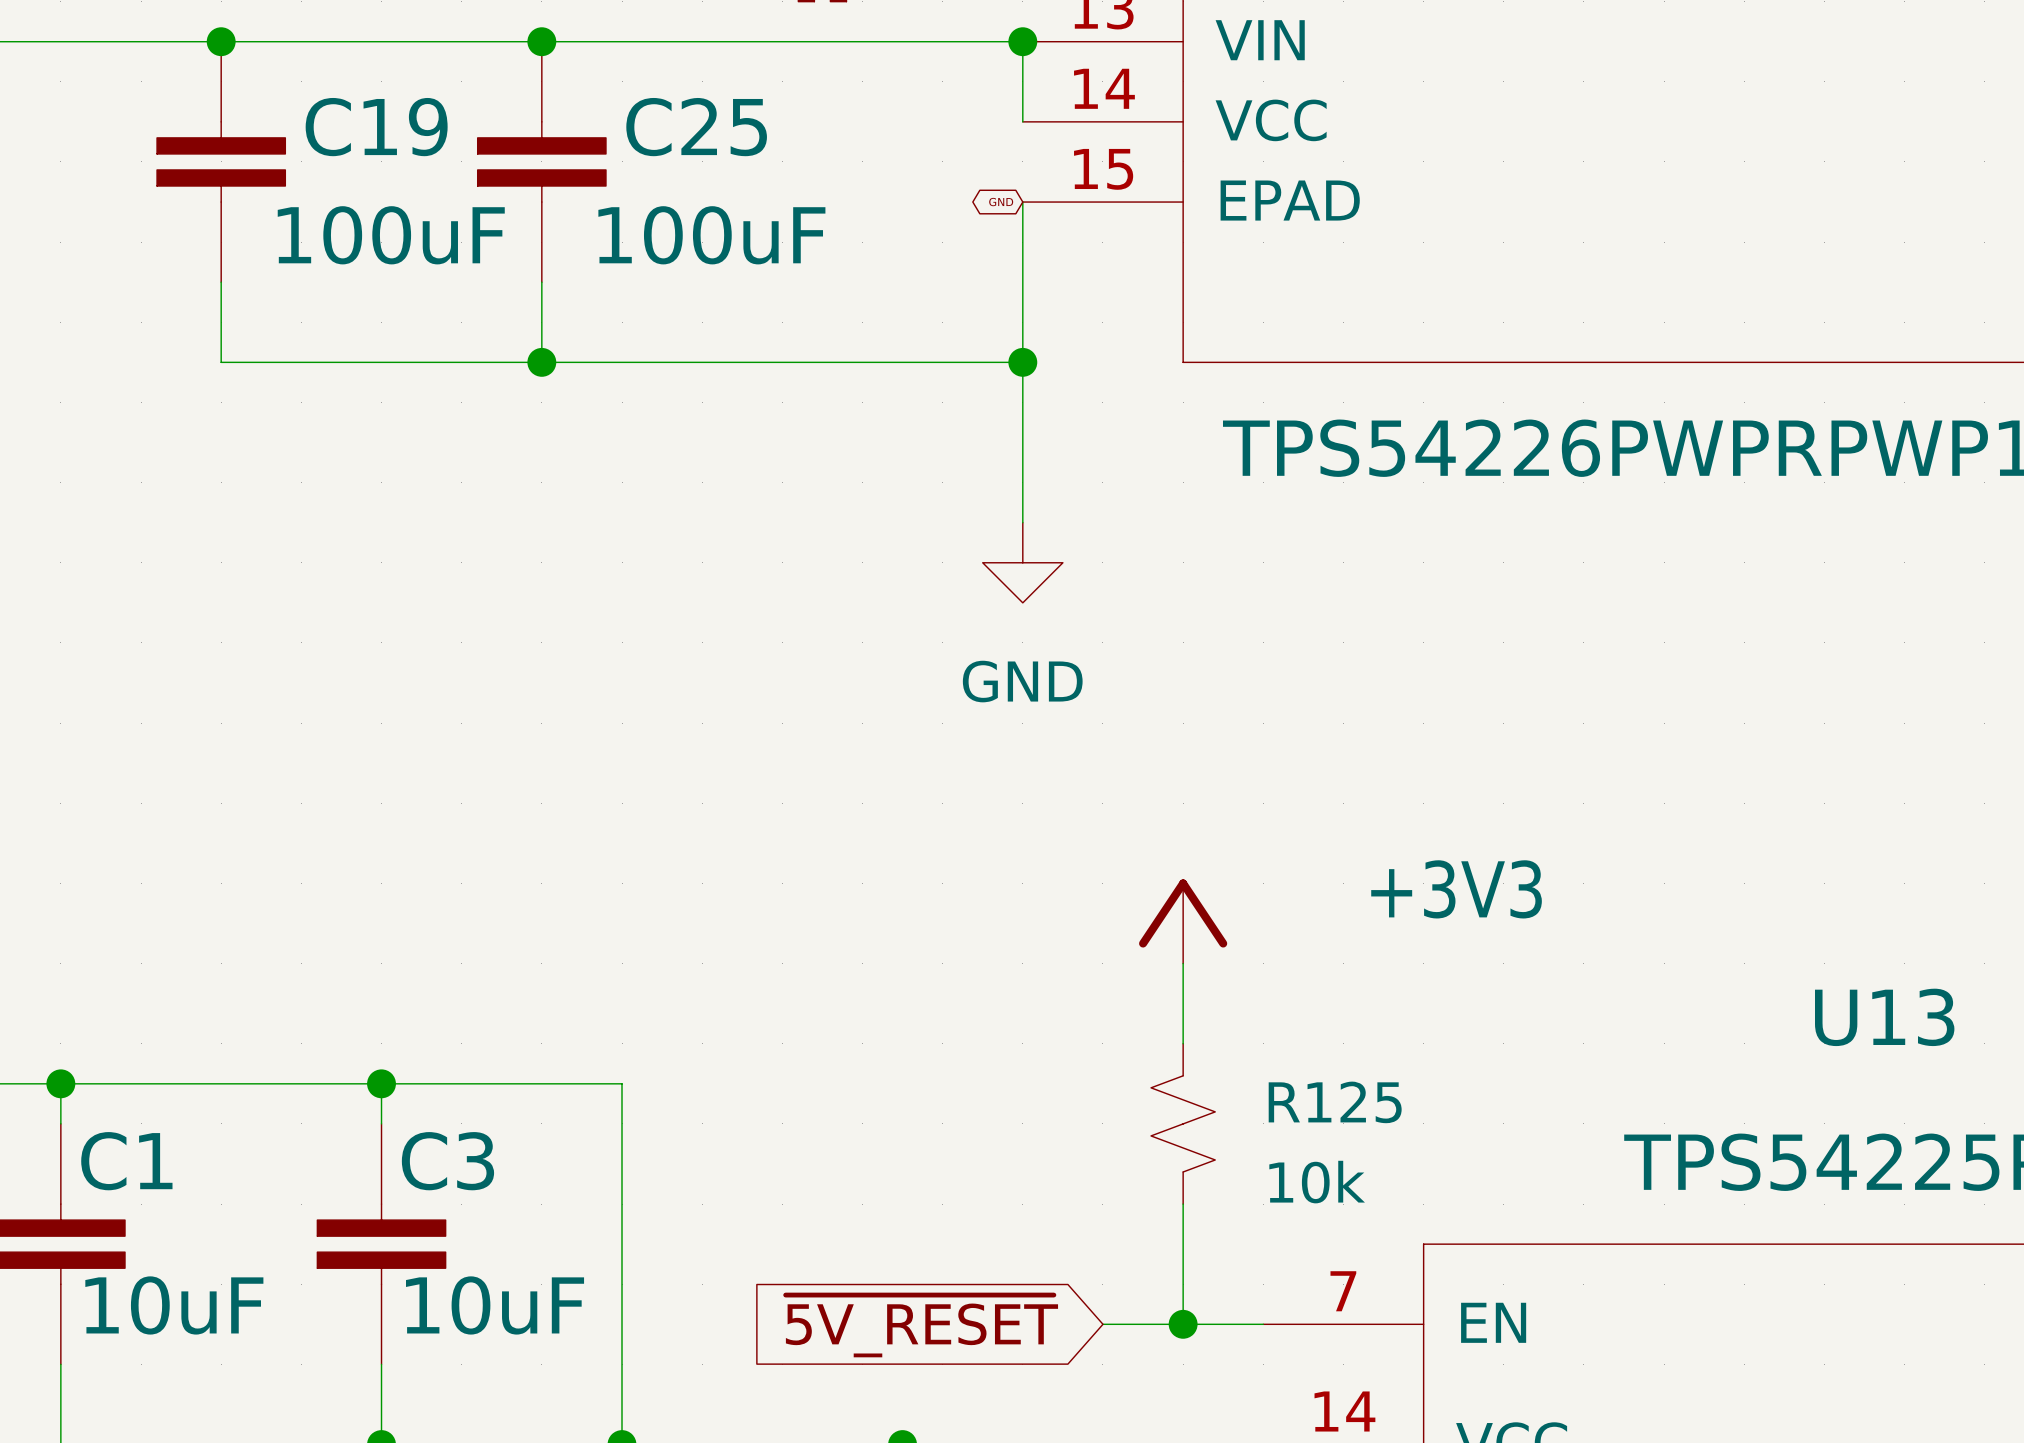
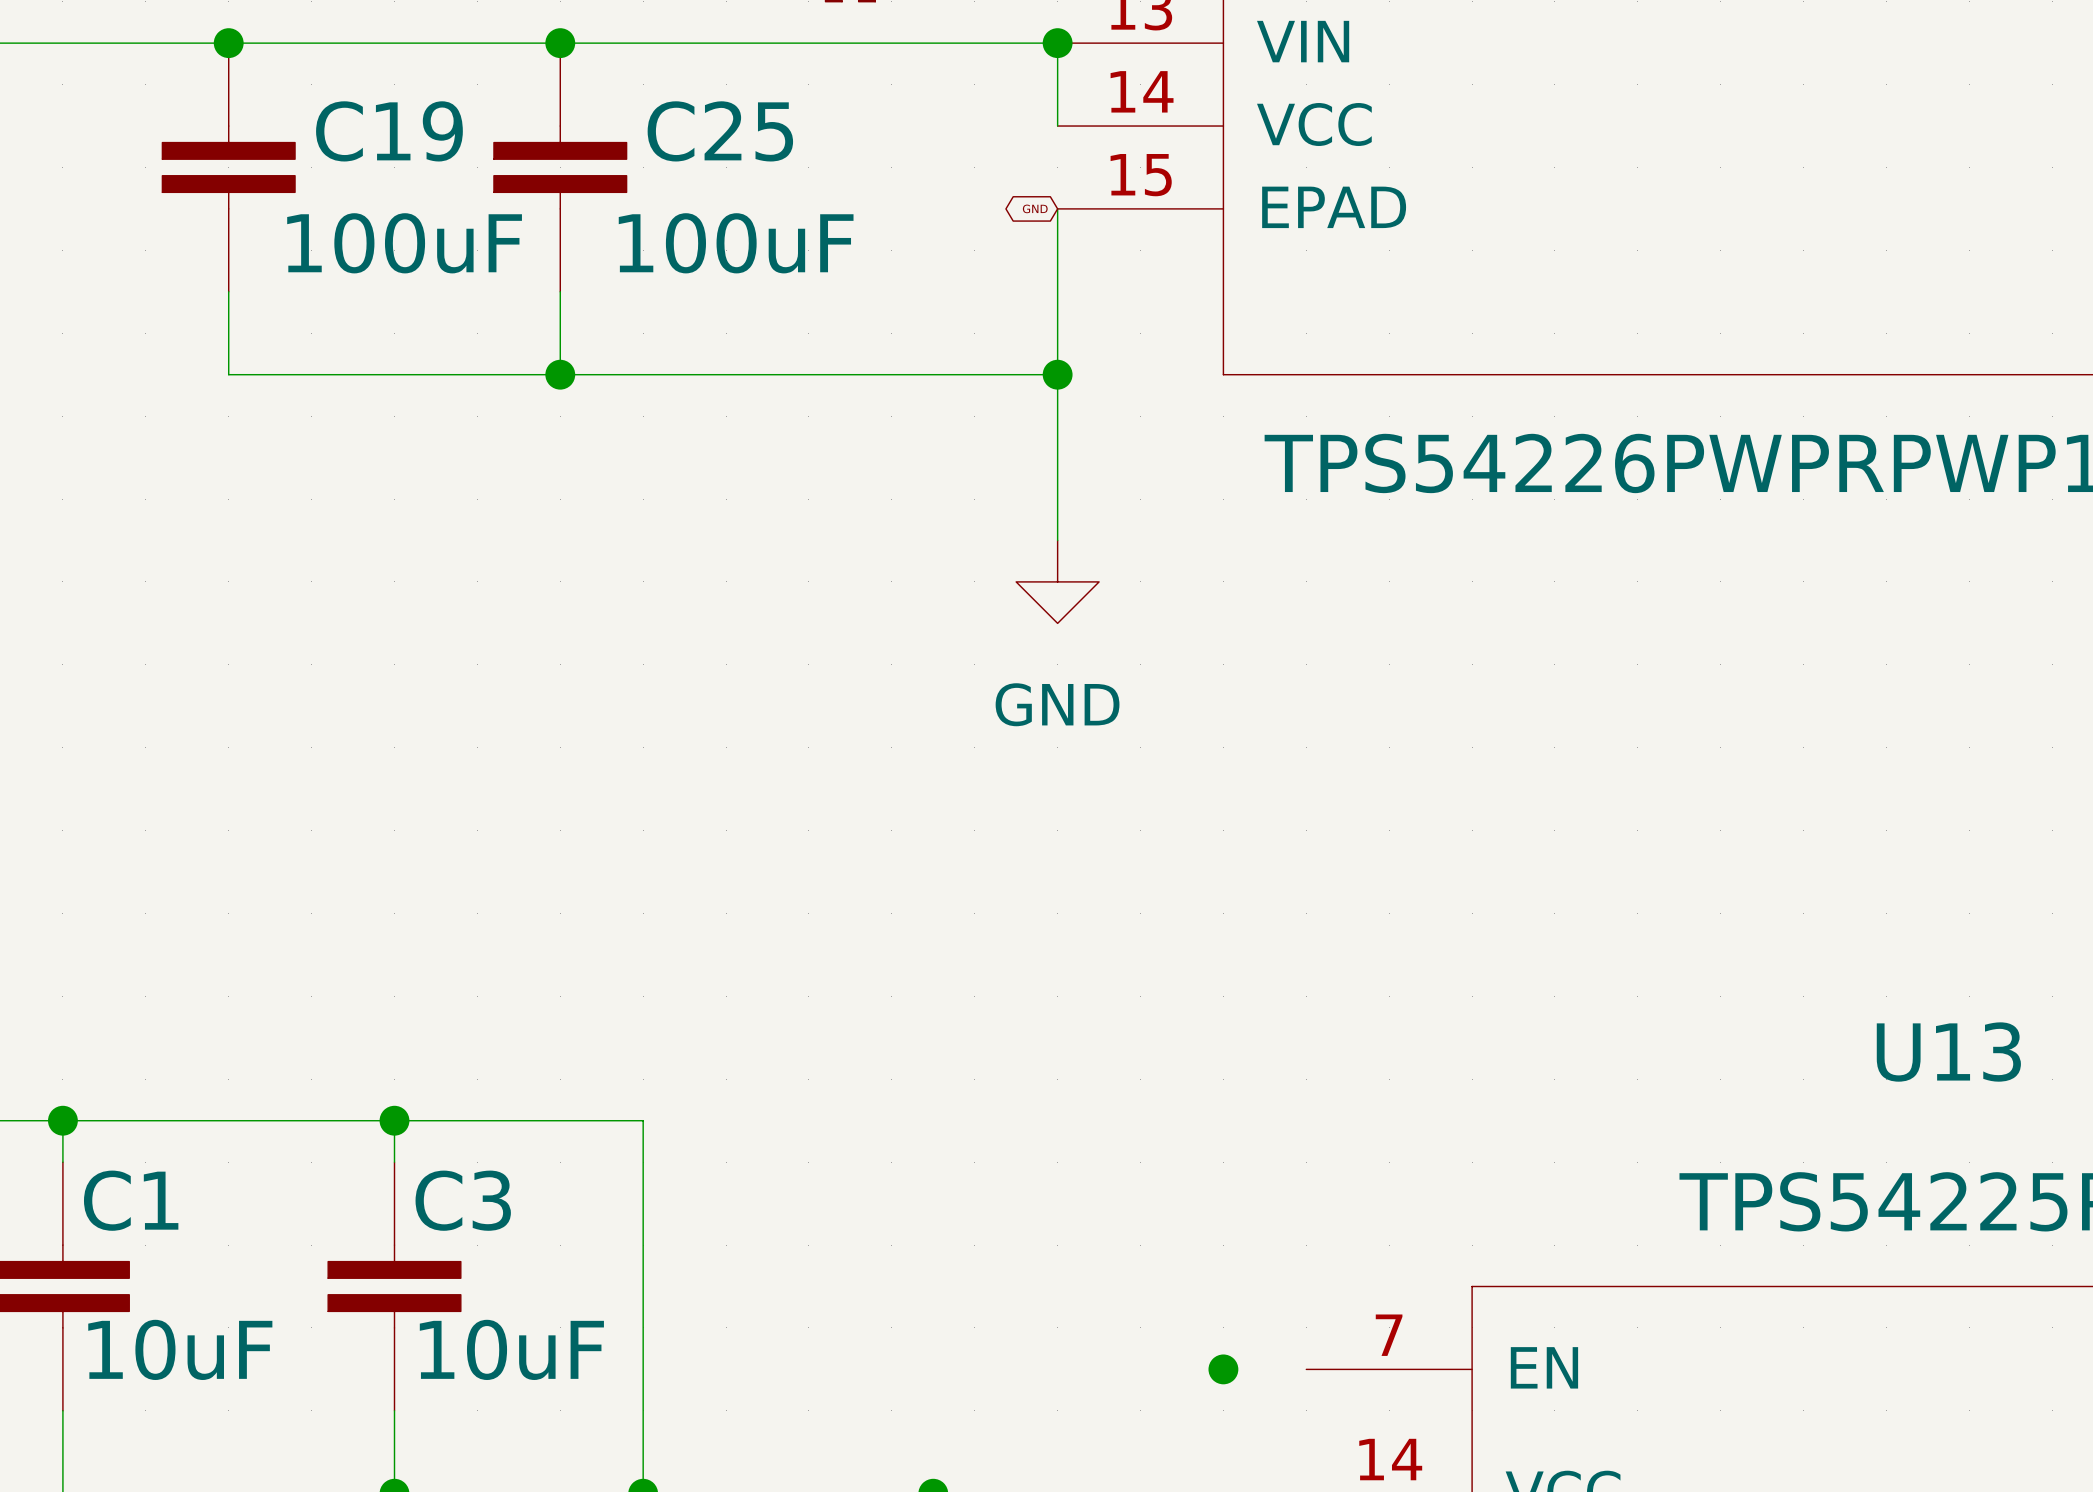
power symbol: +3V3 (1183, 921) -> none
wire: (1183, 963) (1183, 1043) -> none
R125: 10k (1183, 1123) -> none
wire: (1183, 1204) (1183, 1324) -> none
wire: (1102, 1324) (1263, 1324) -> none
global label: ~{5V_RESET} (921, 1326) -> none

